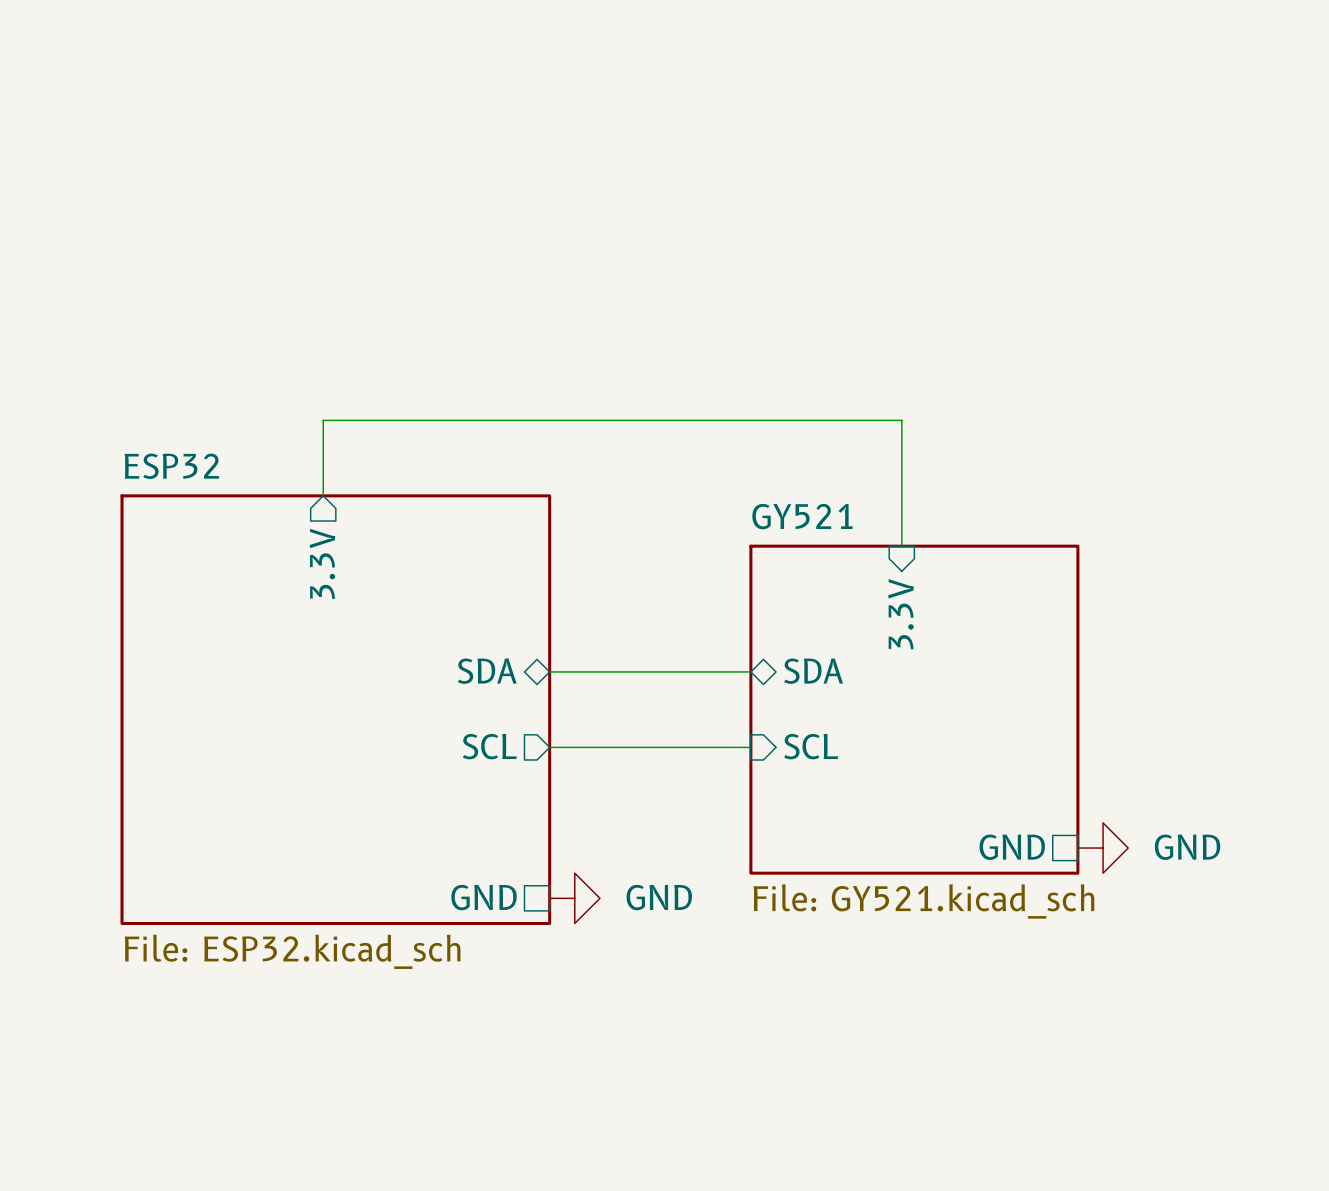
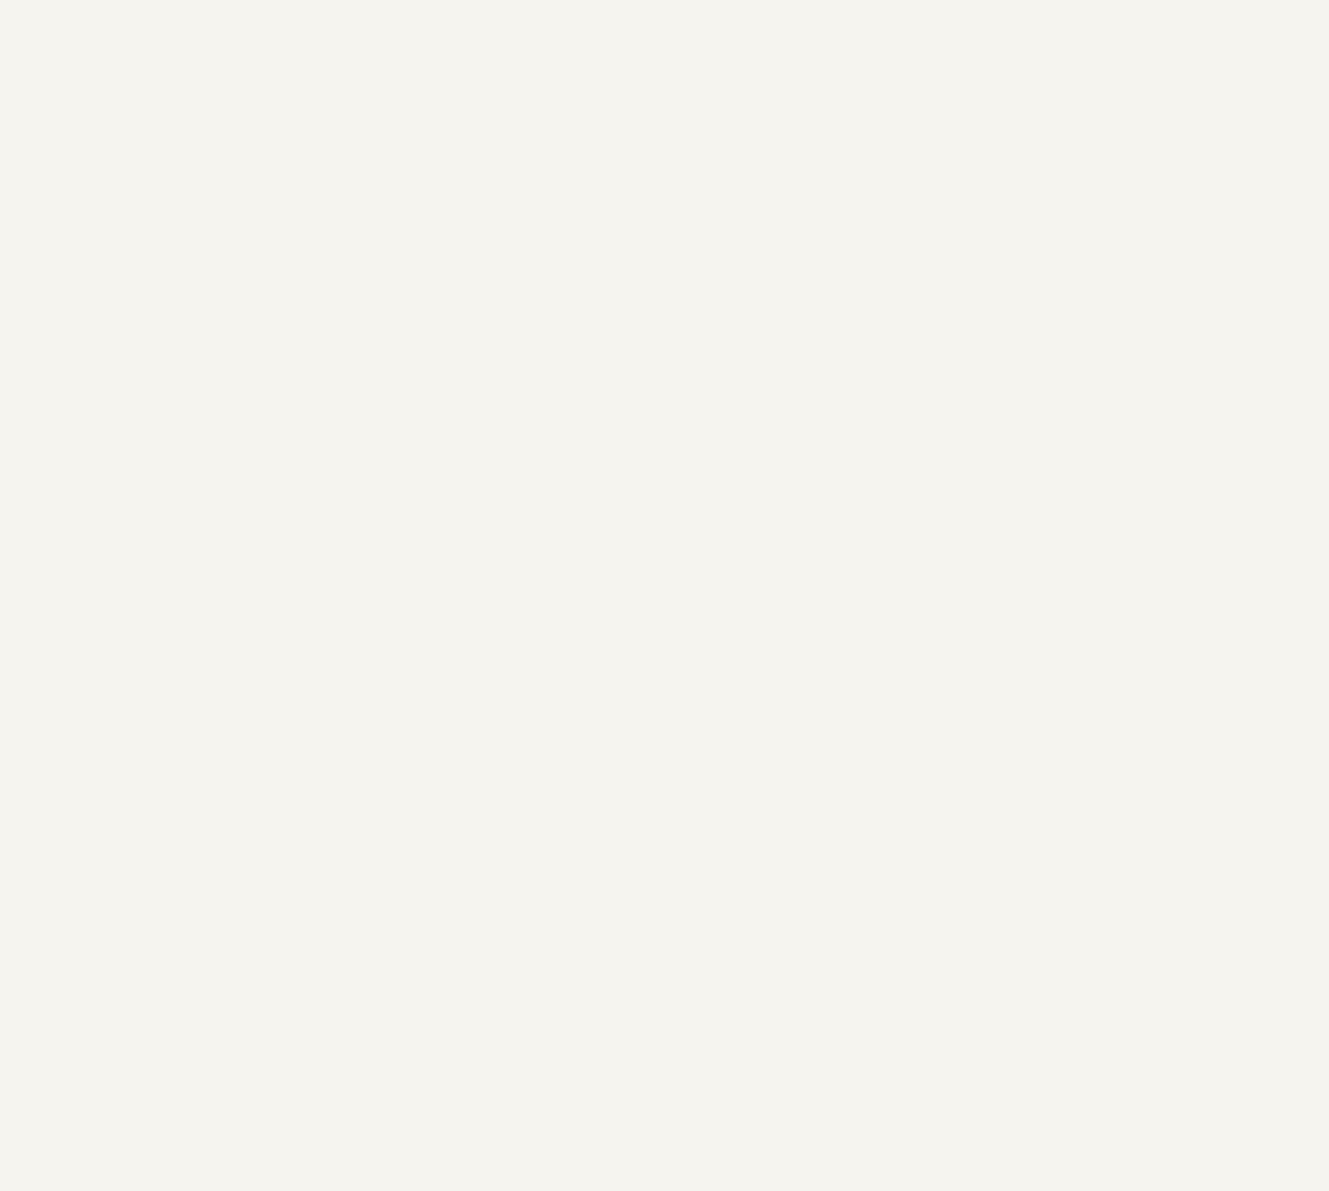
wire: (323, 495) (323, 420) (901, 420) (901, 546) -> none
sheet pin: 3.3V (322, 563) -> none
sheet pin: 3.3V (901, 614) -> none
sheet pin: SDA (487, 671) -> none
wire: (549, 671) (750, 671) -> none
sheet pin: SDA (813, 671) -> none
sheet ESP32: File: ESP32.kicad_sch (335, 709) -> none
sheet GY521: File: GY521.kicad_sch (914, 709) -> none
sheet pin: SCL (489, 746) -> none
sheet pin: SCL (811, 746) -> none
wire: (549, 747) (750, 747) -> none
sheet pin: GND (1012, 847) -> none
power symbol: GND (1103, 848) -> none
sheet pin: GND (484, 897) -> none
power symbol: GND (574, 898) -> none

